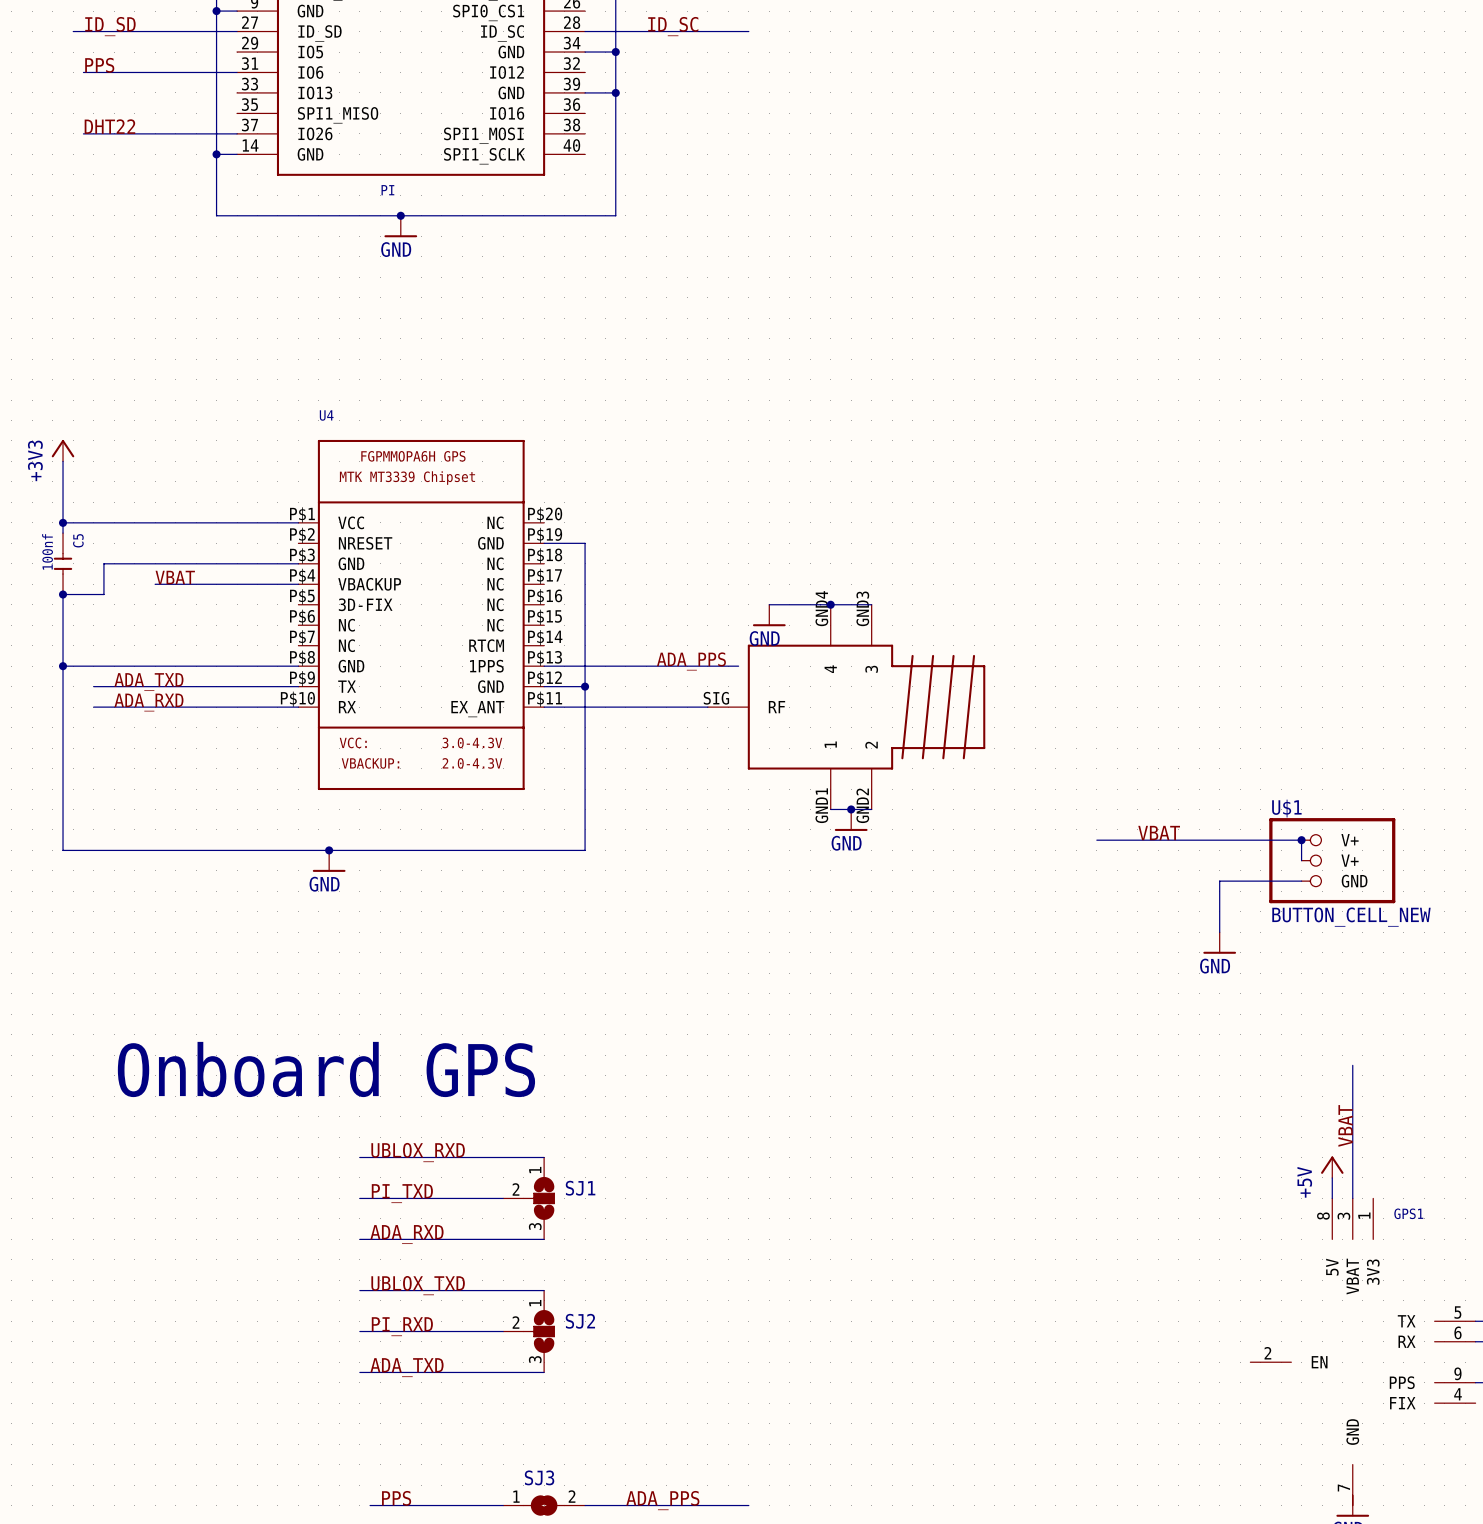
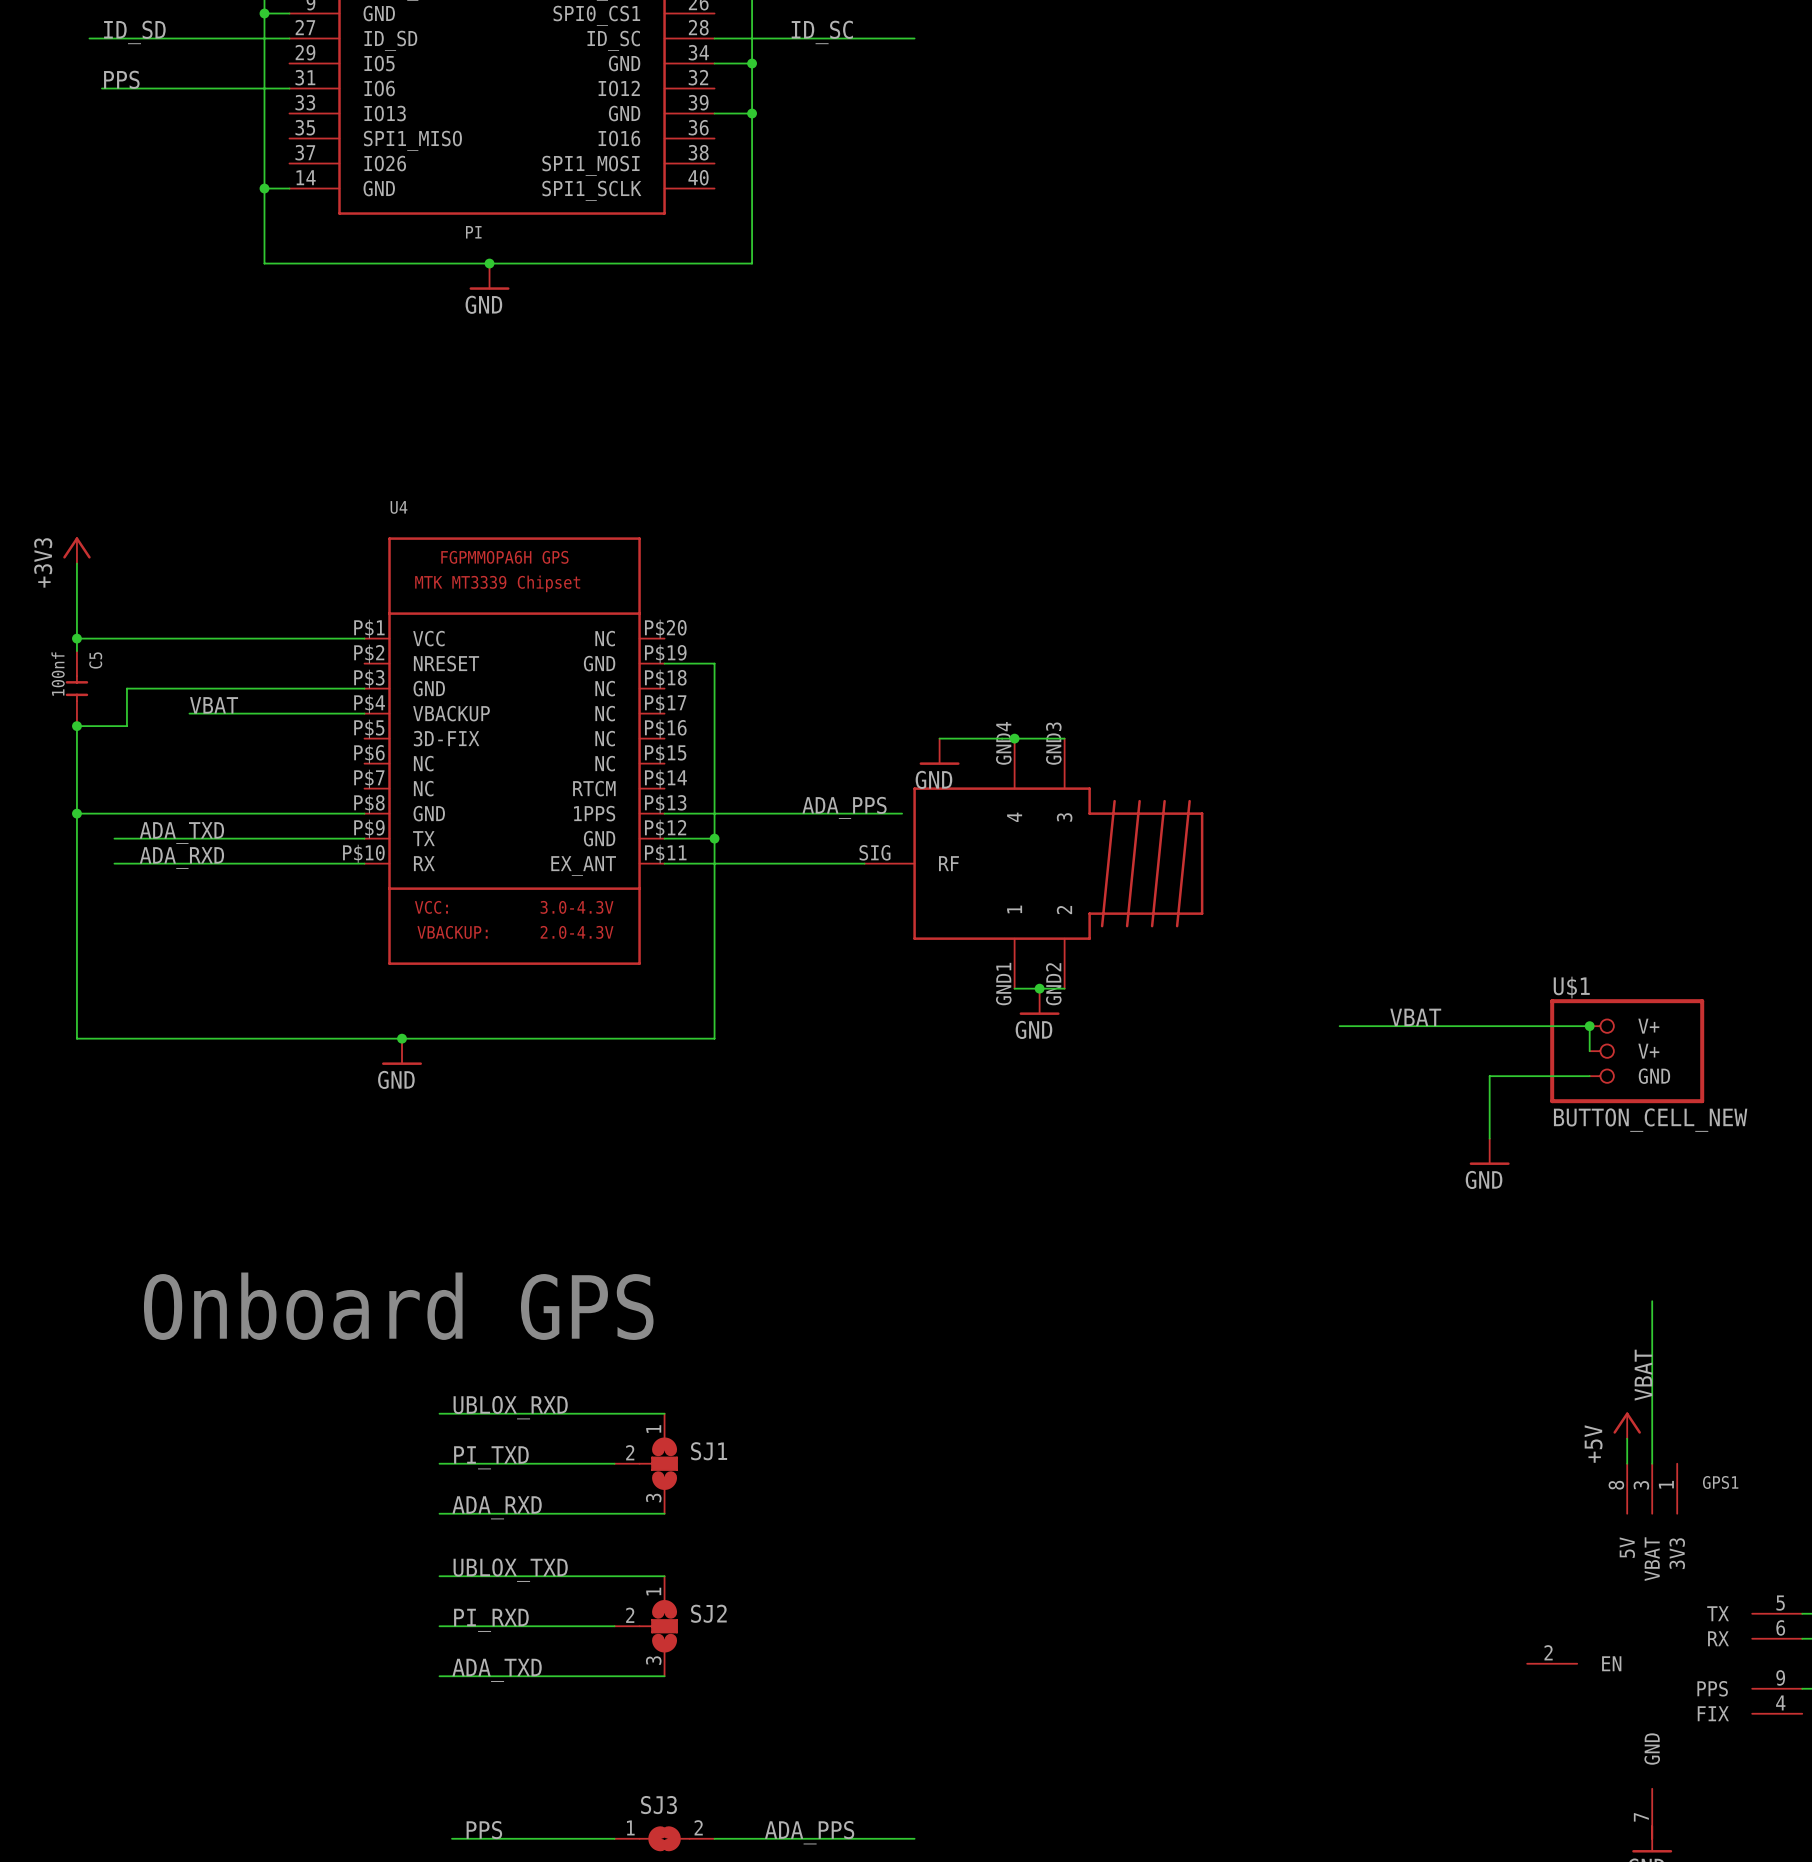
label: DHT22 (109, 126) -> none
wire: (83, 133) (237, 133) -> none

